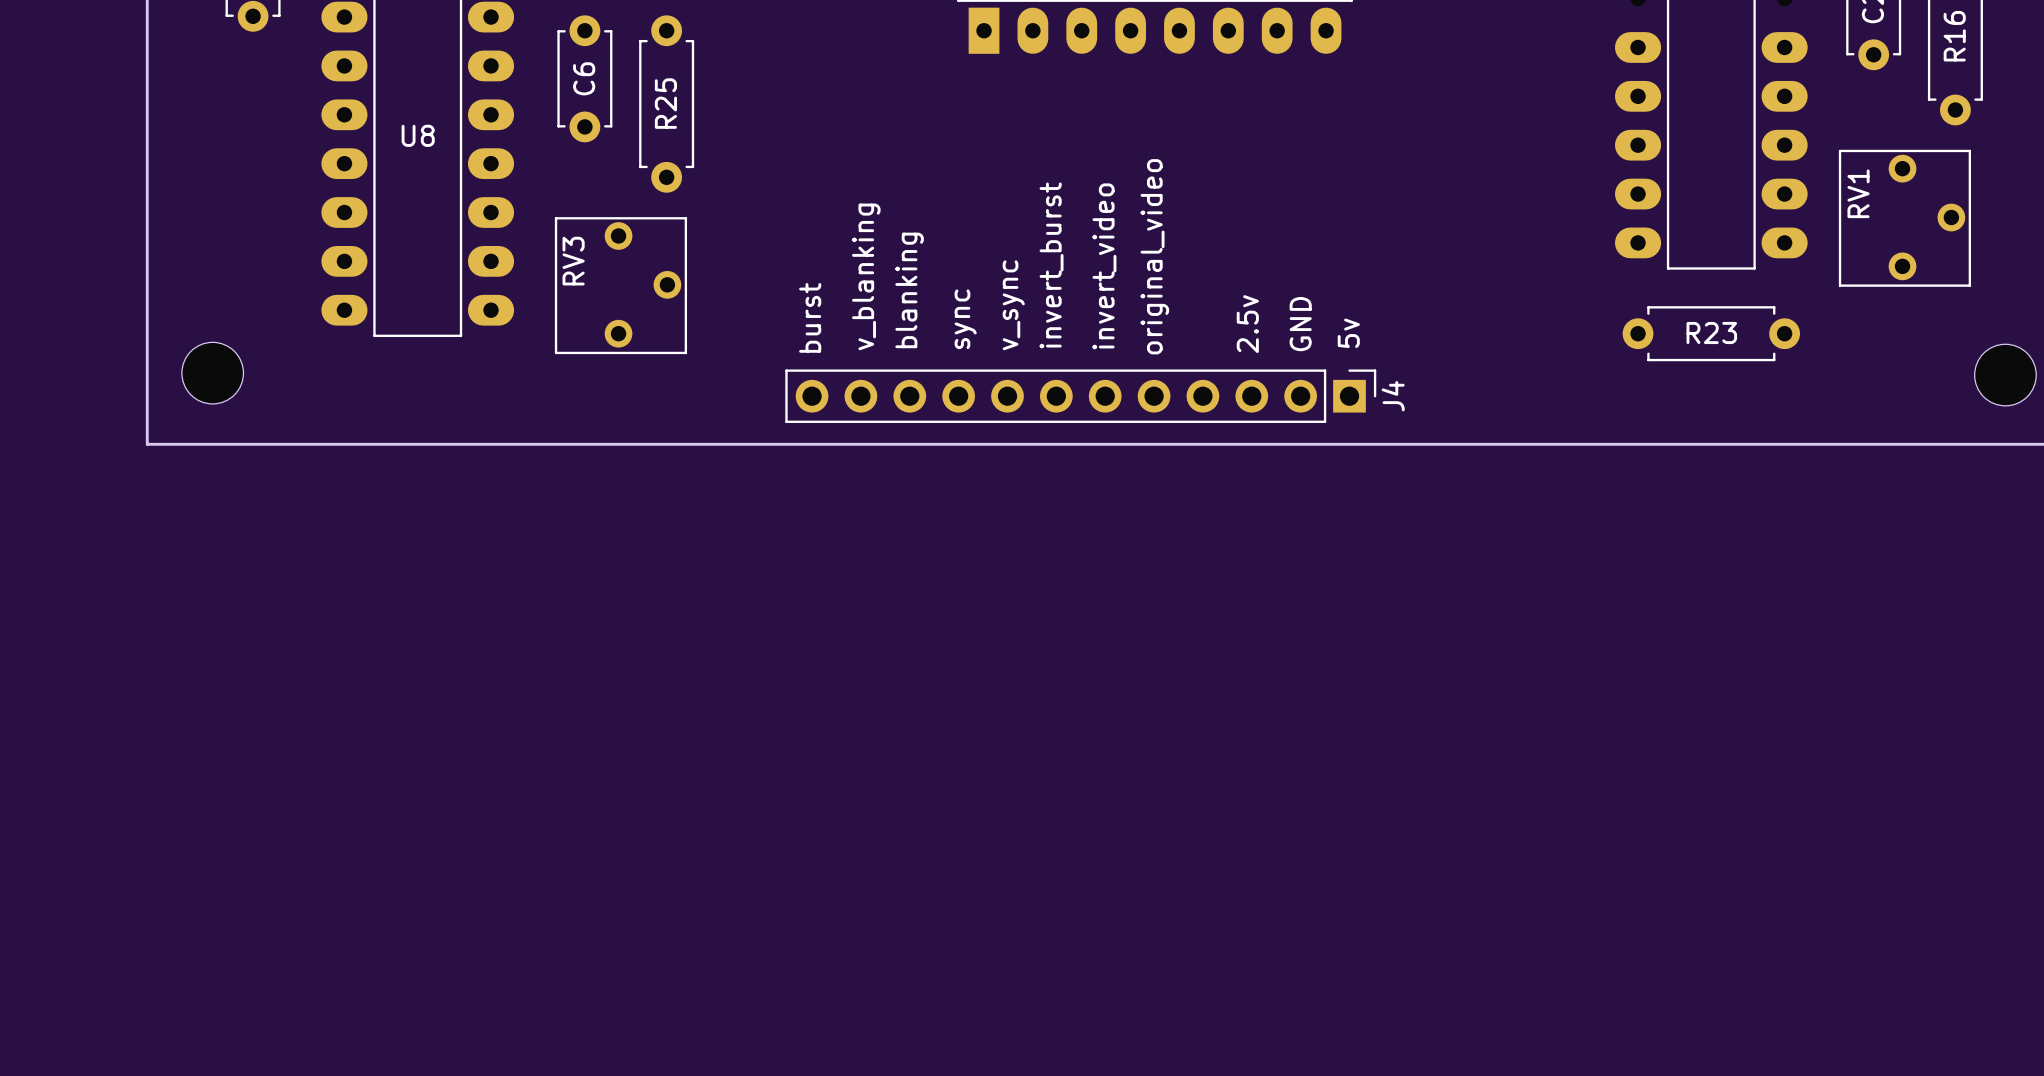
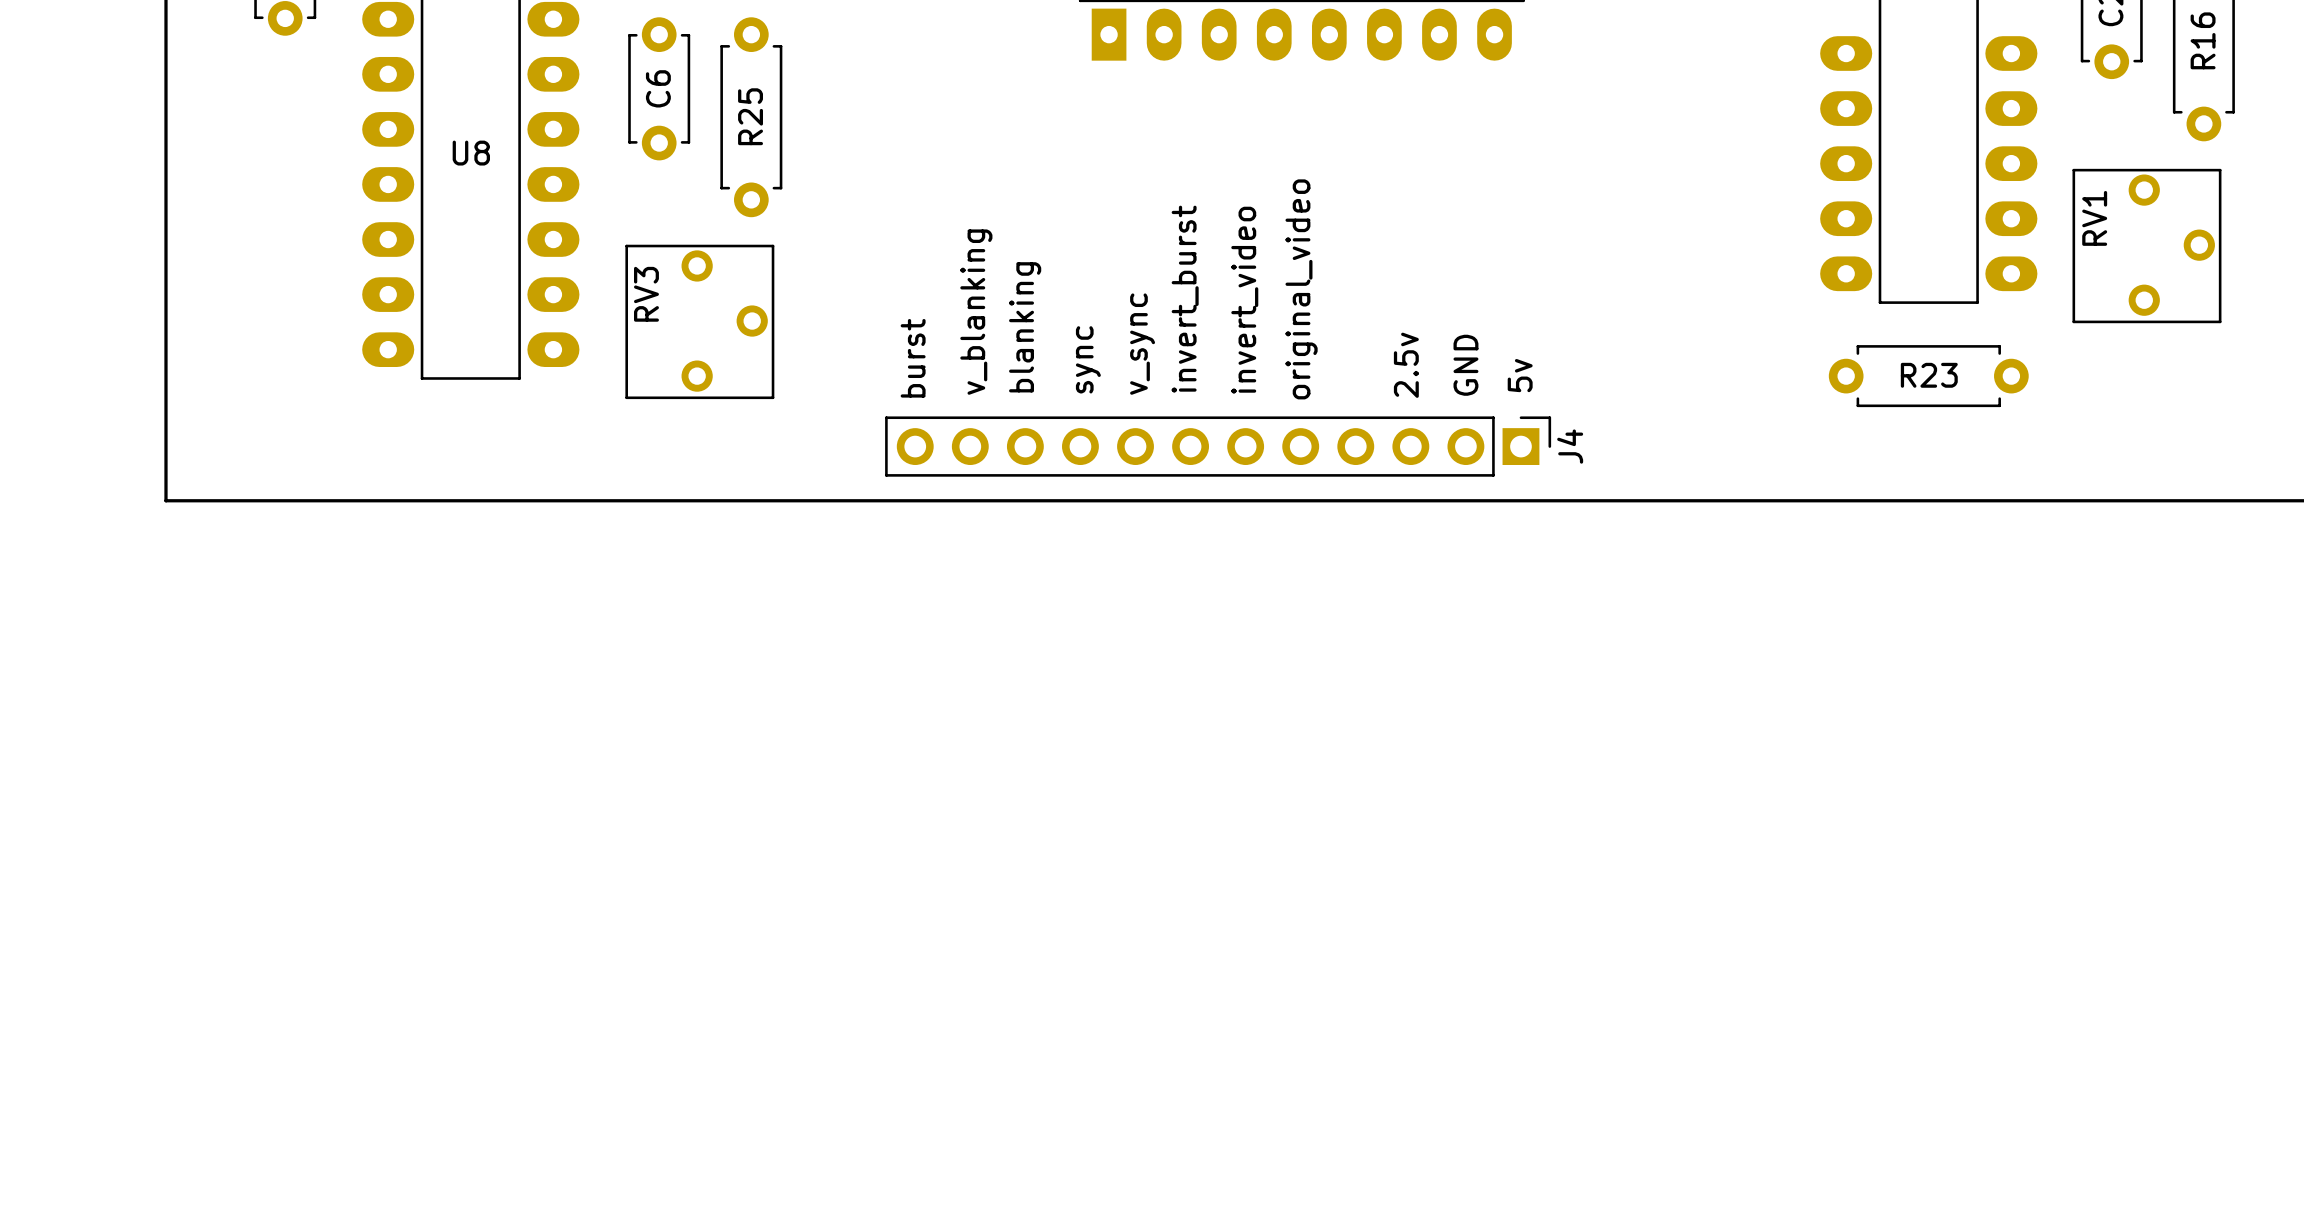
part: (212, 373) -> none
part: (2005, 375) -> none

